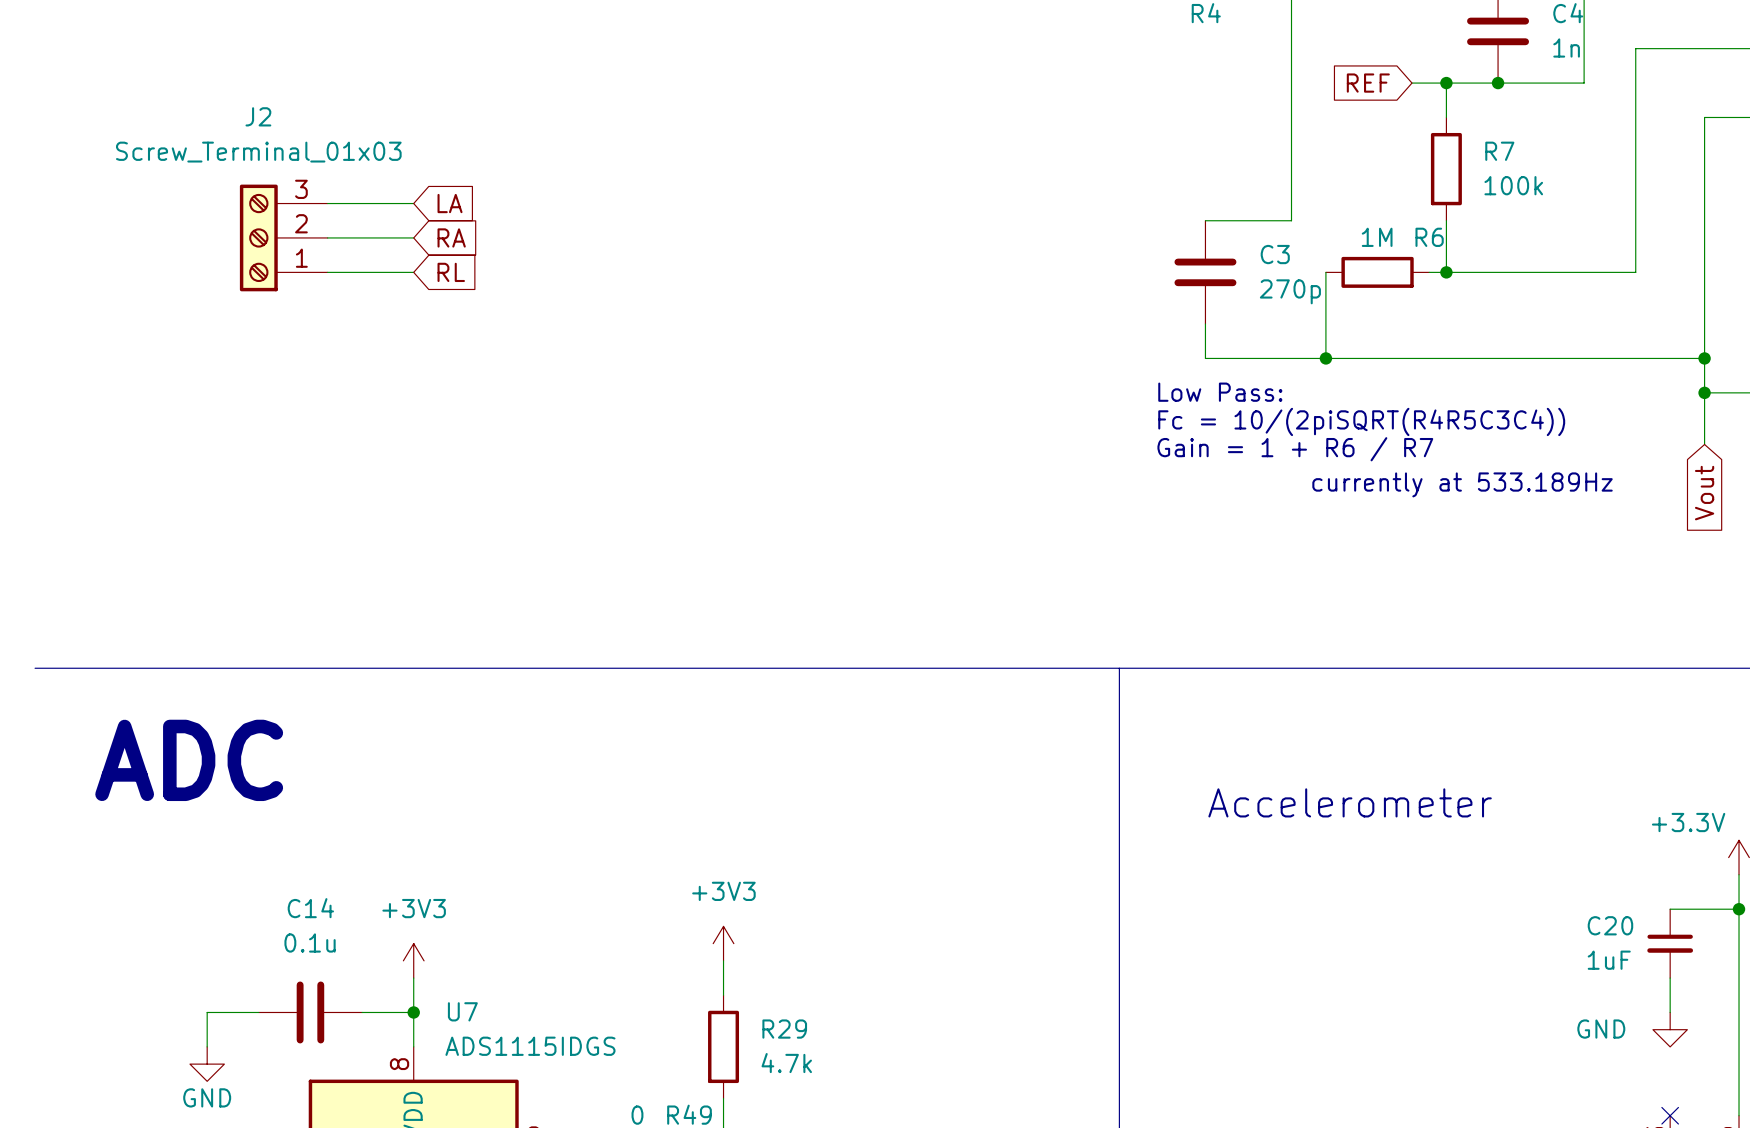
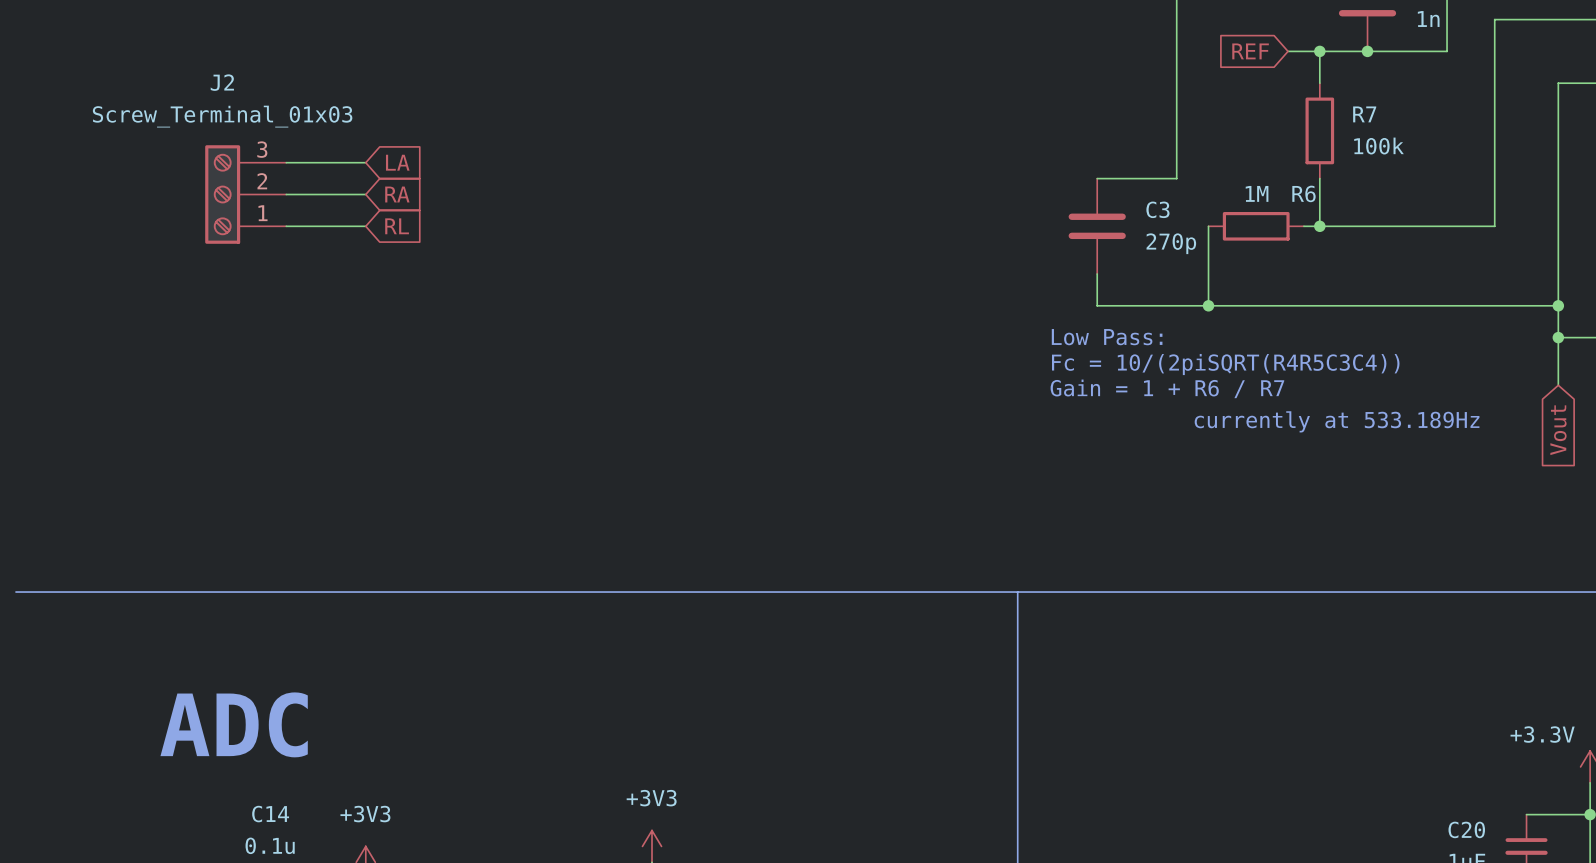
text position: ADC (189, 760) -> ADC (234, 724)
text: Accelerometer (1350, 802) -> none

